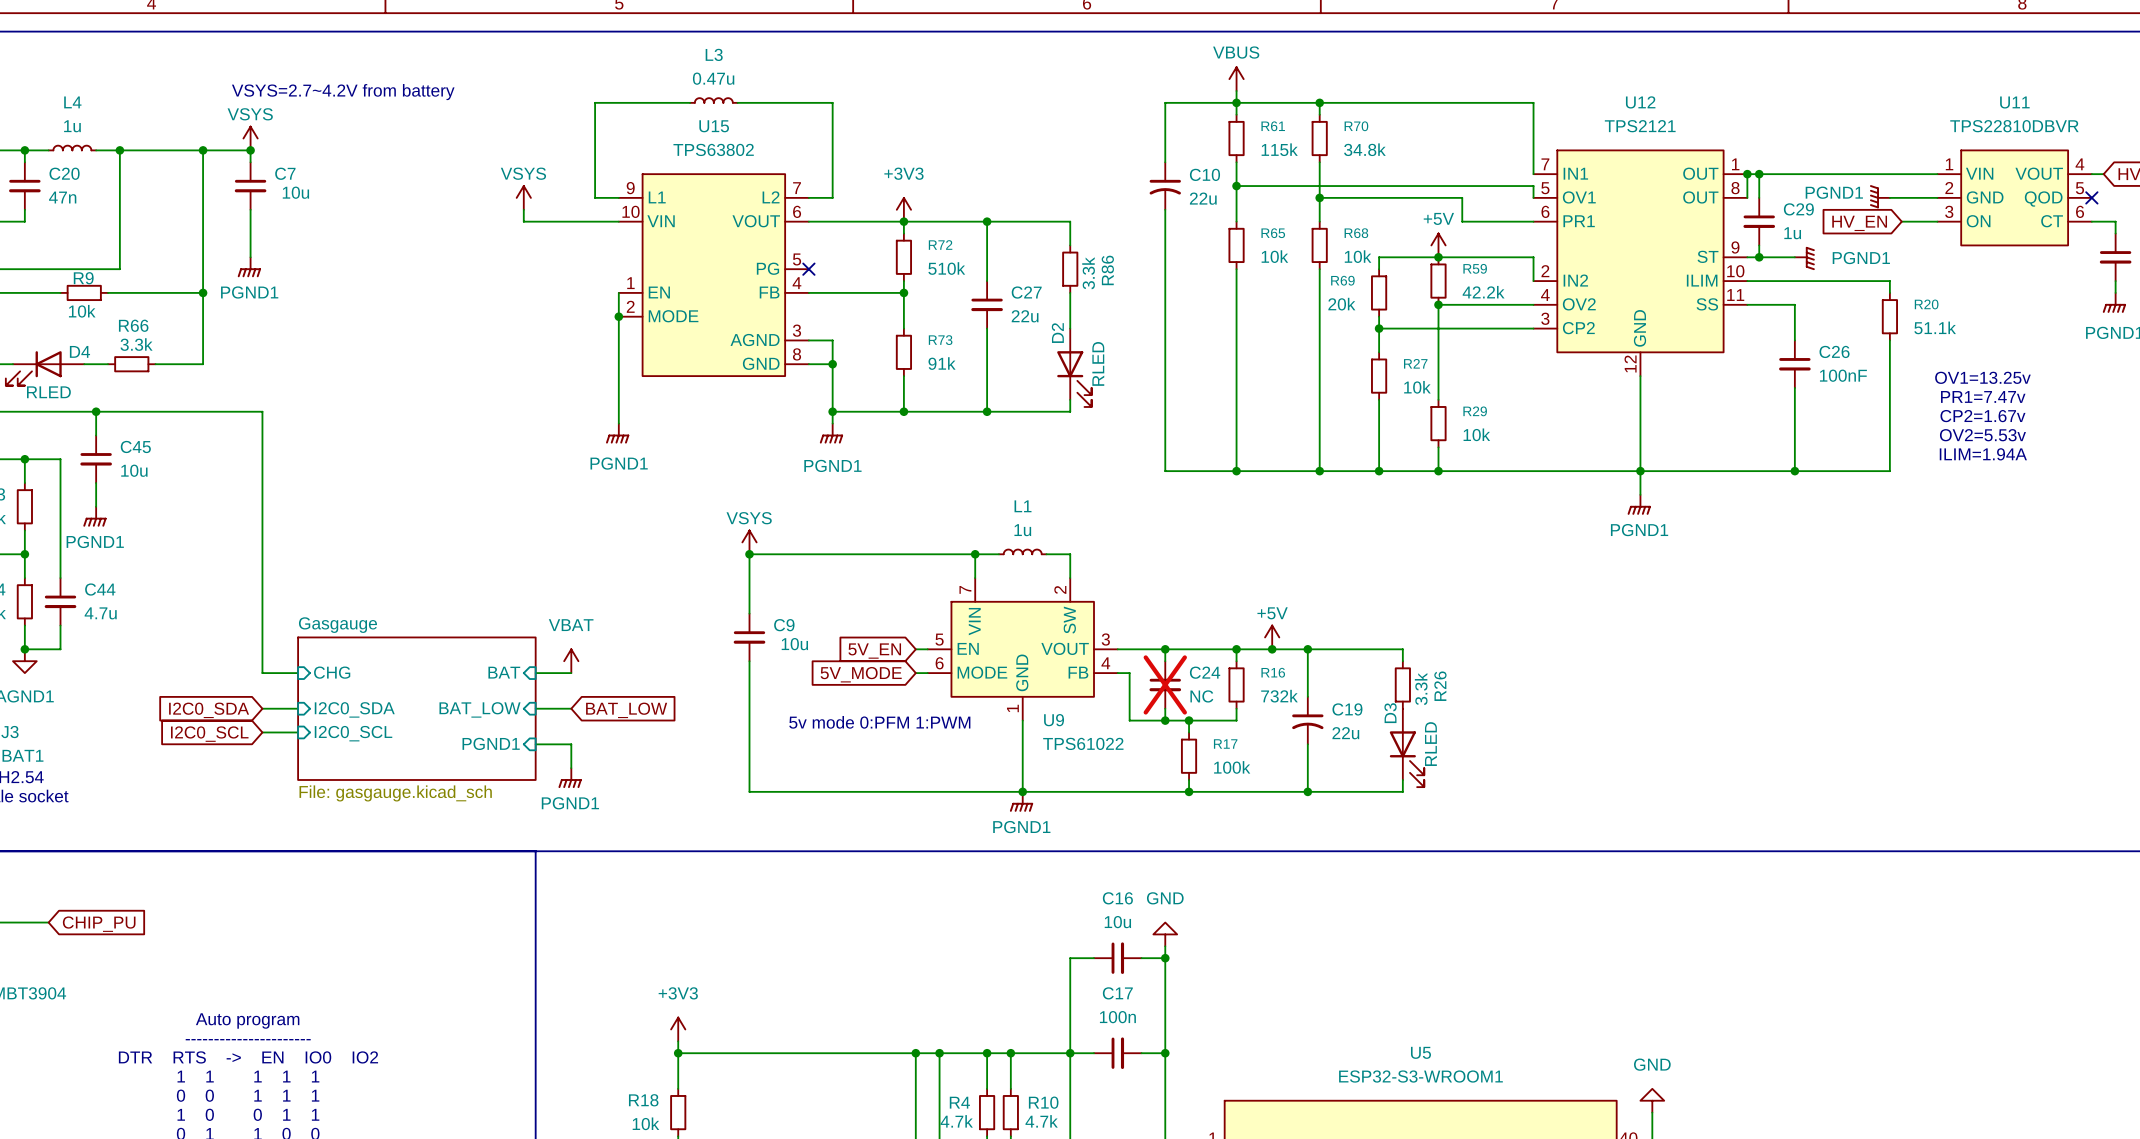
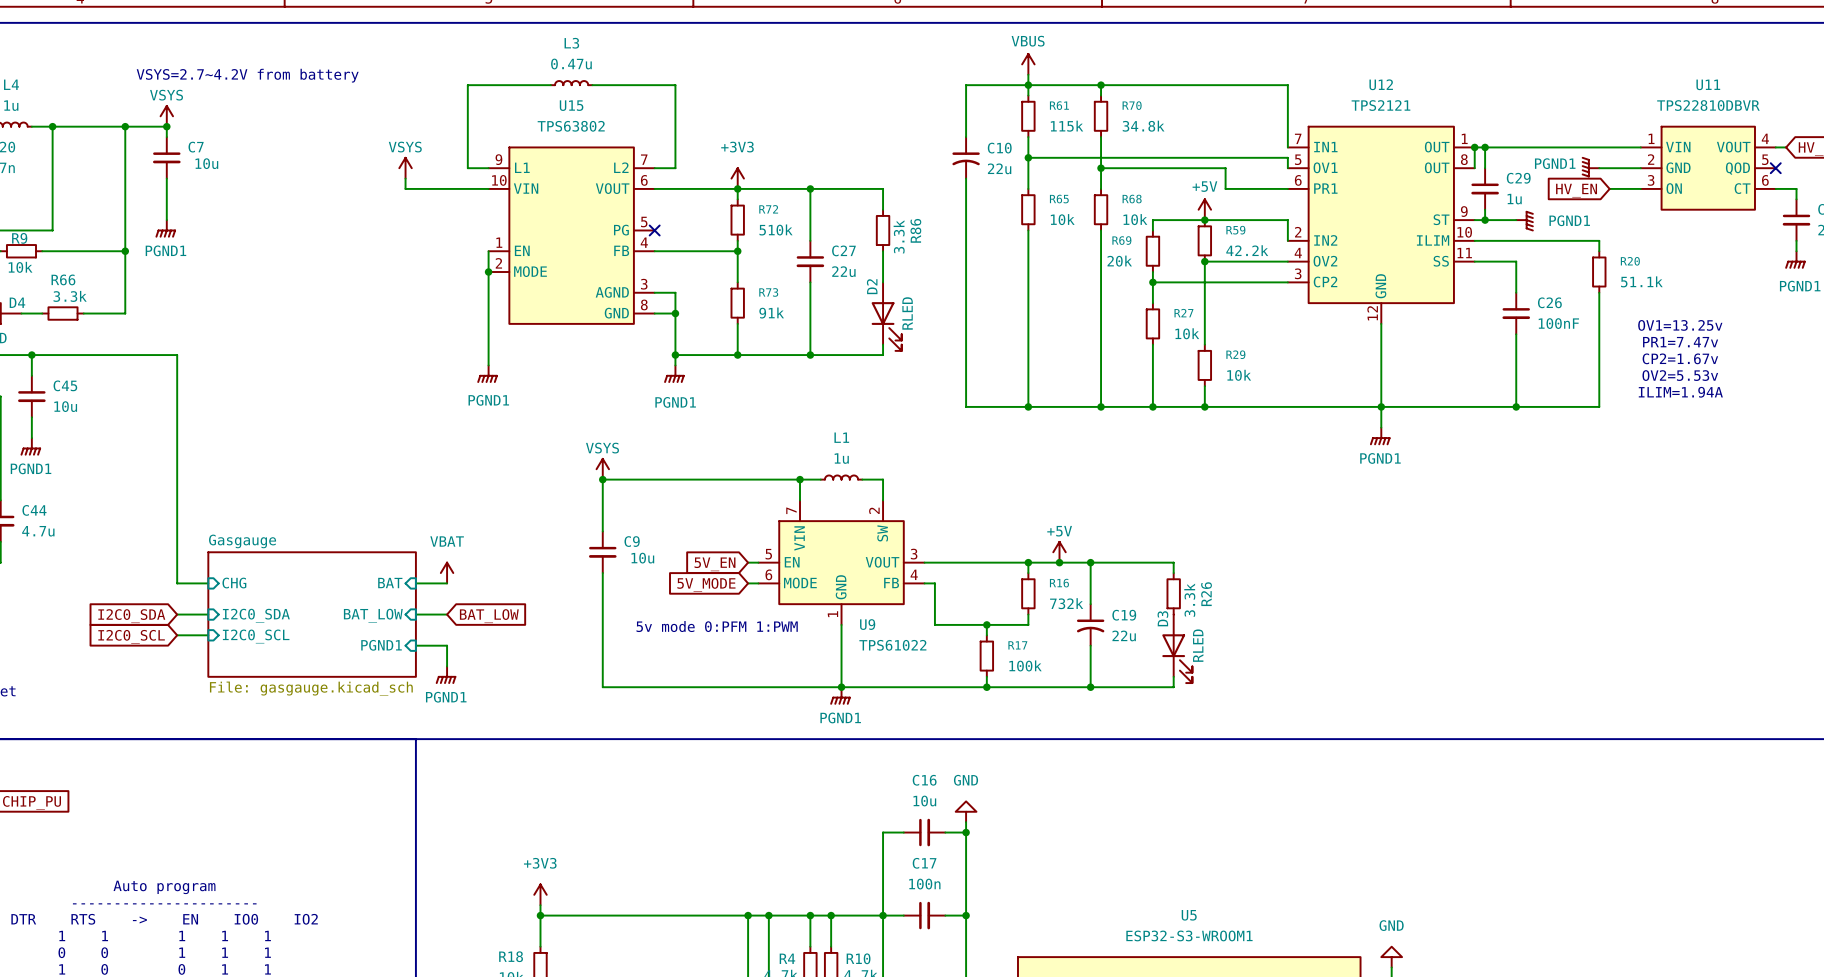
wire: (1165, 649) (1165, 661) -> none
junction: (1165, 649) -> none
C24: NC (1165, 684) -> none
wire: (1165, 708) (1165, 720) -> none
junction: (1165, 720) -> none

